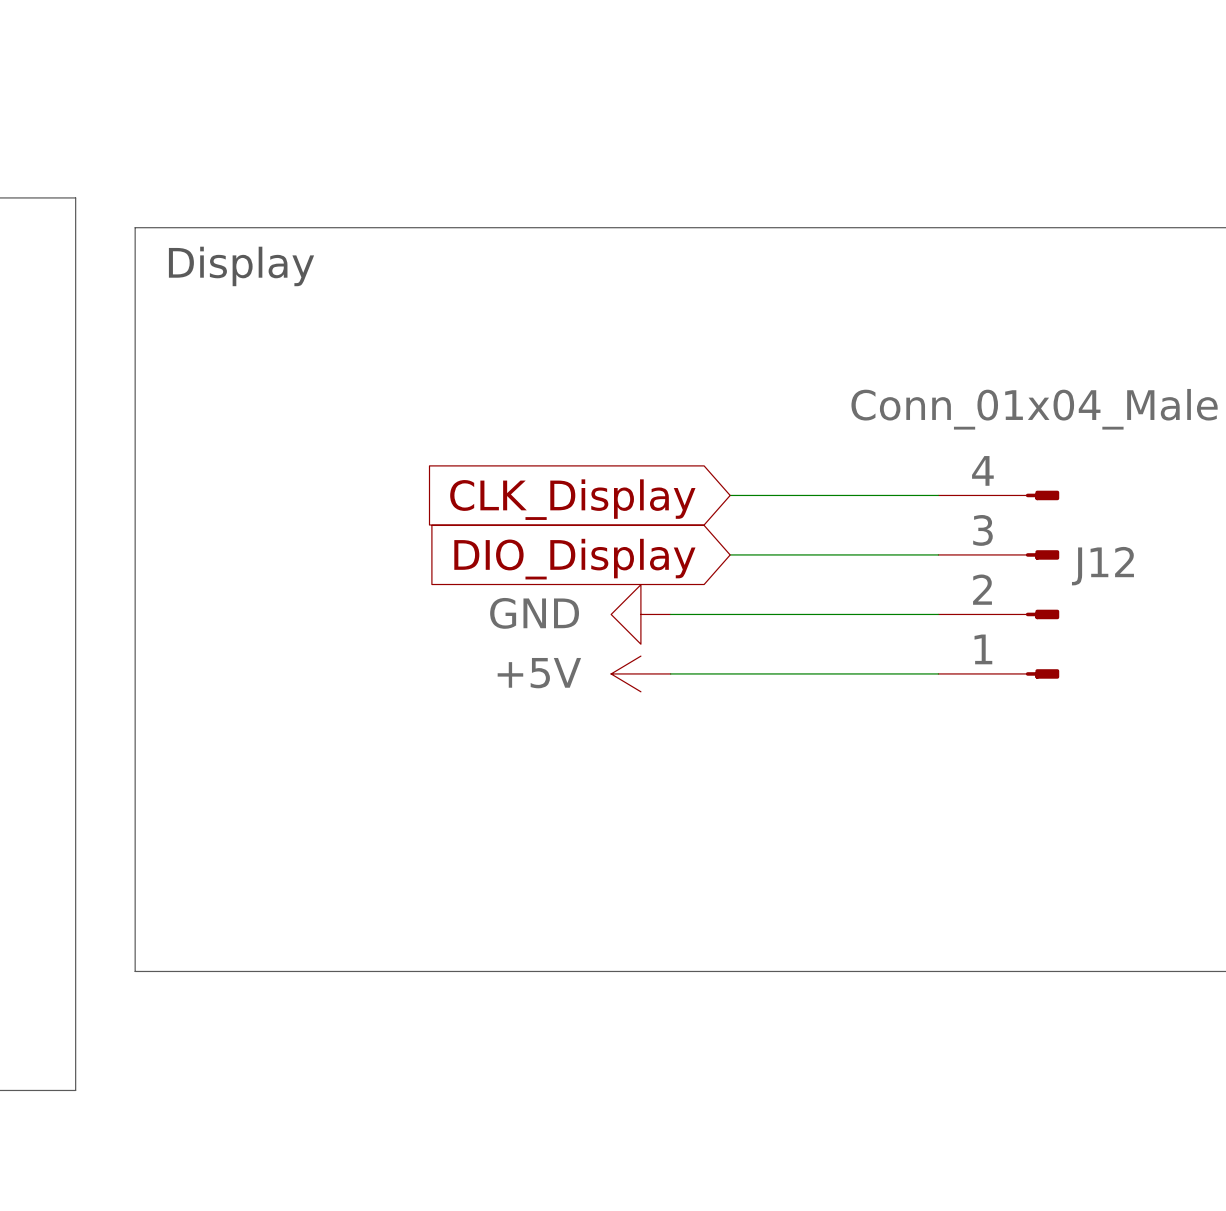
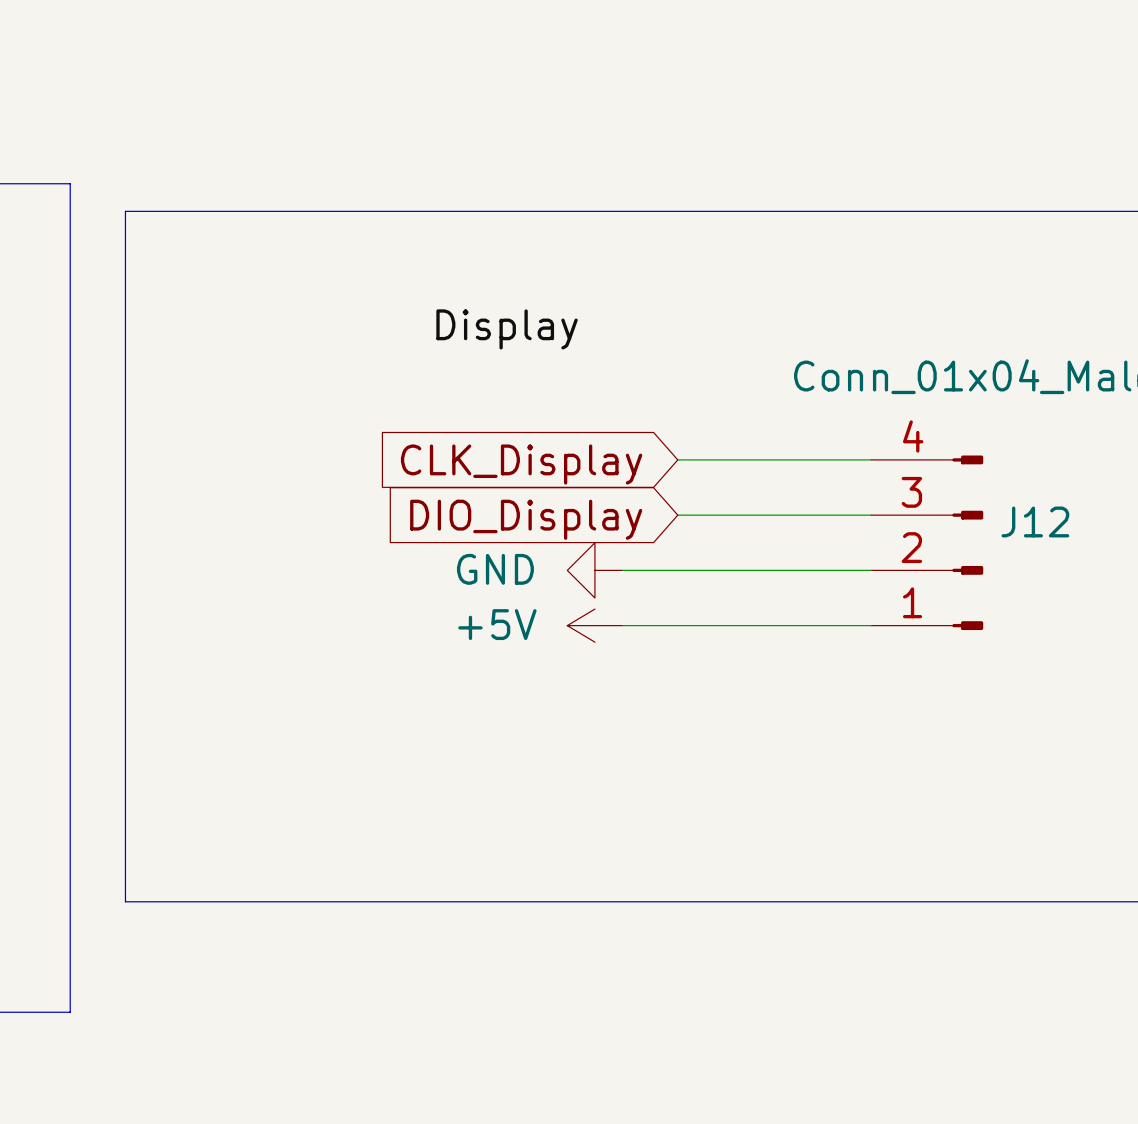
text: Display (241, 266) -> none
label: none -> Display (507, 329)

